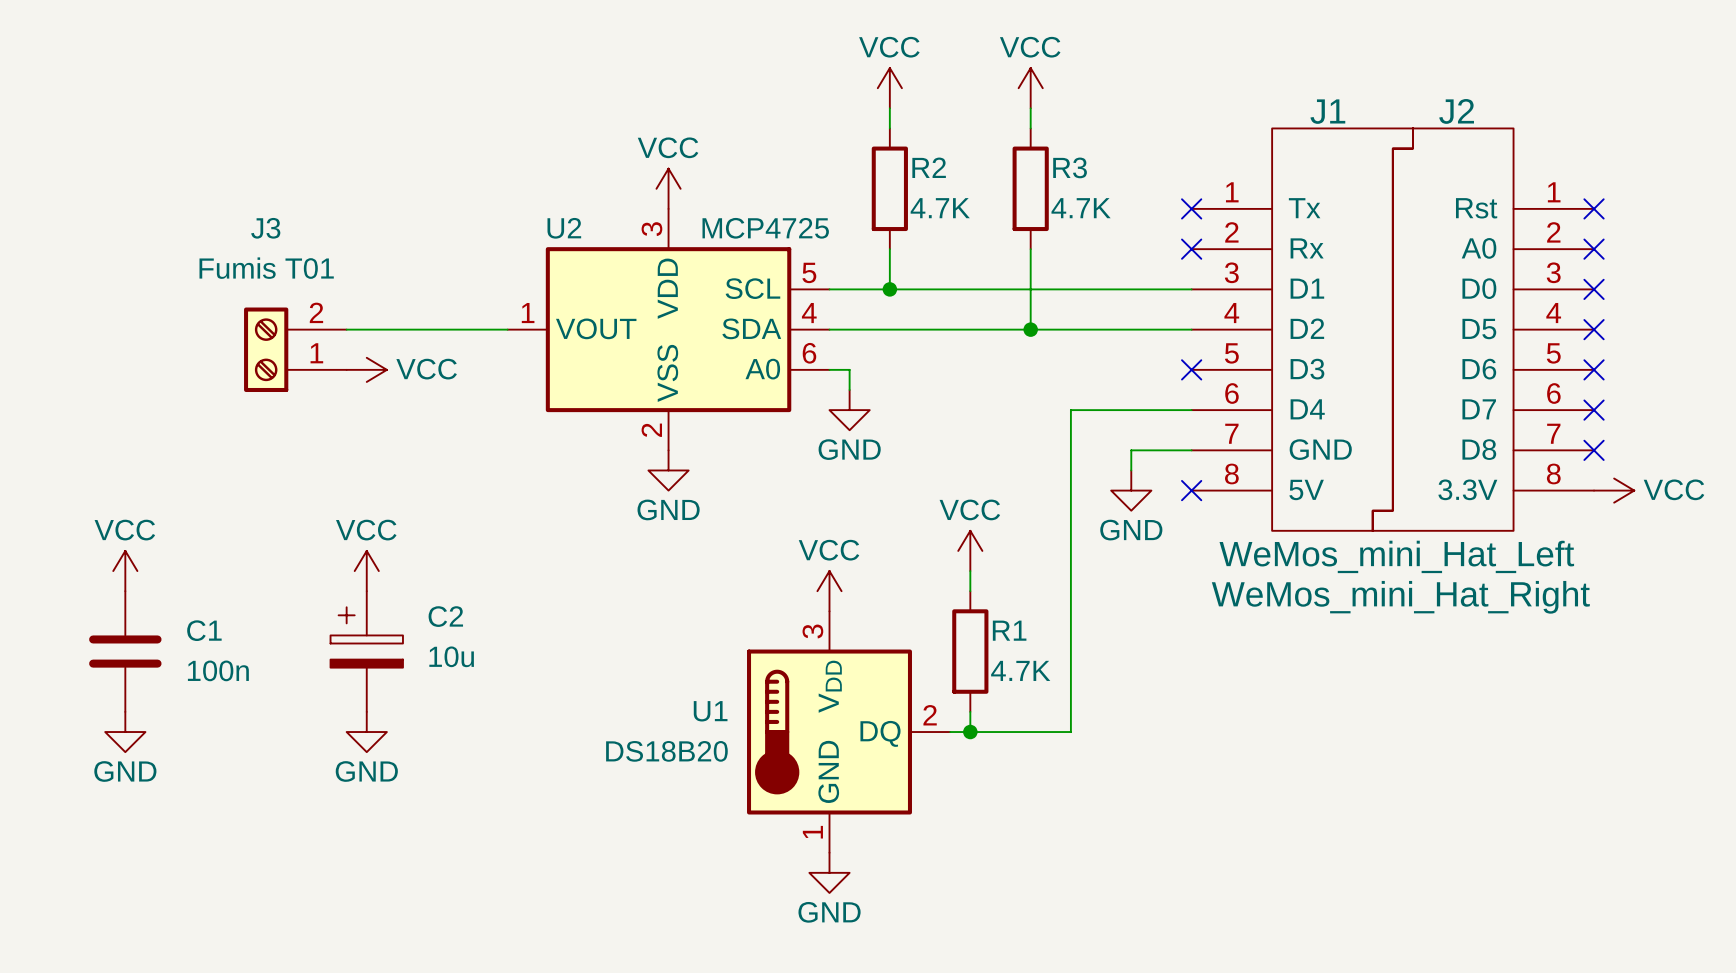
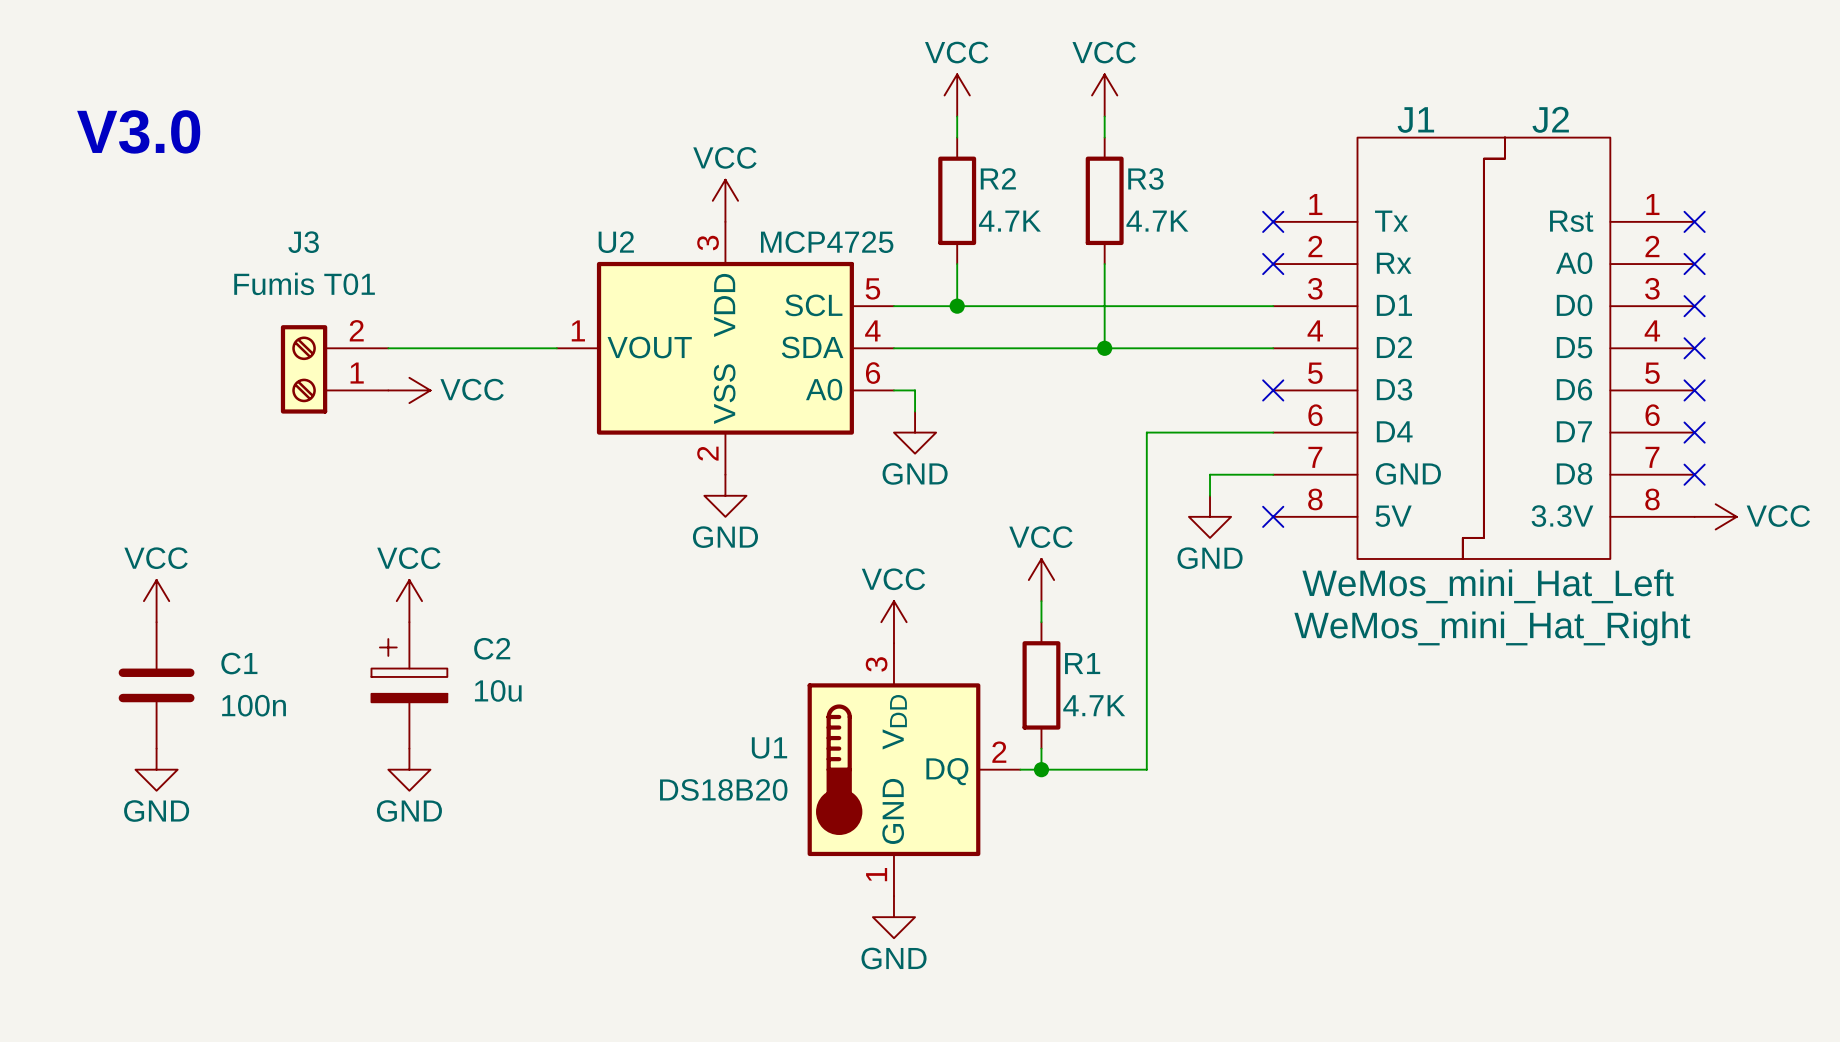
text: none -> V3.0 (138, 131)

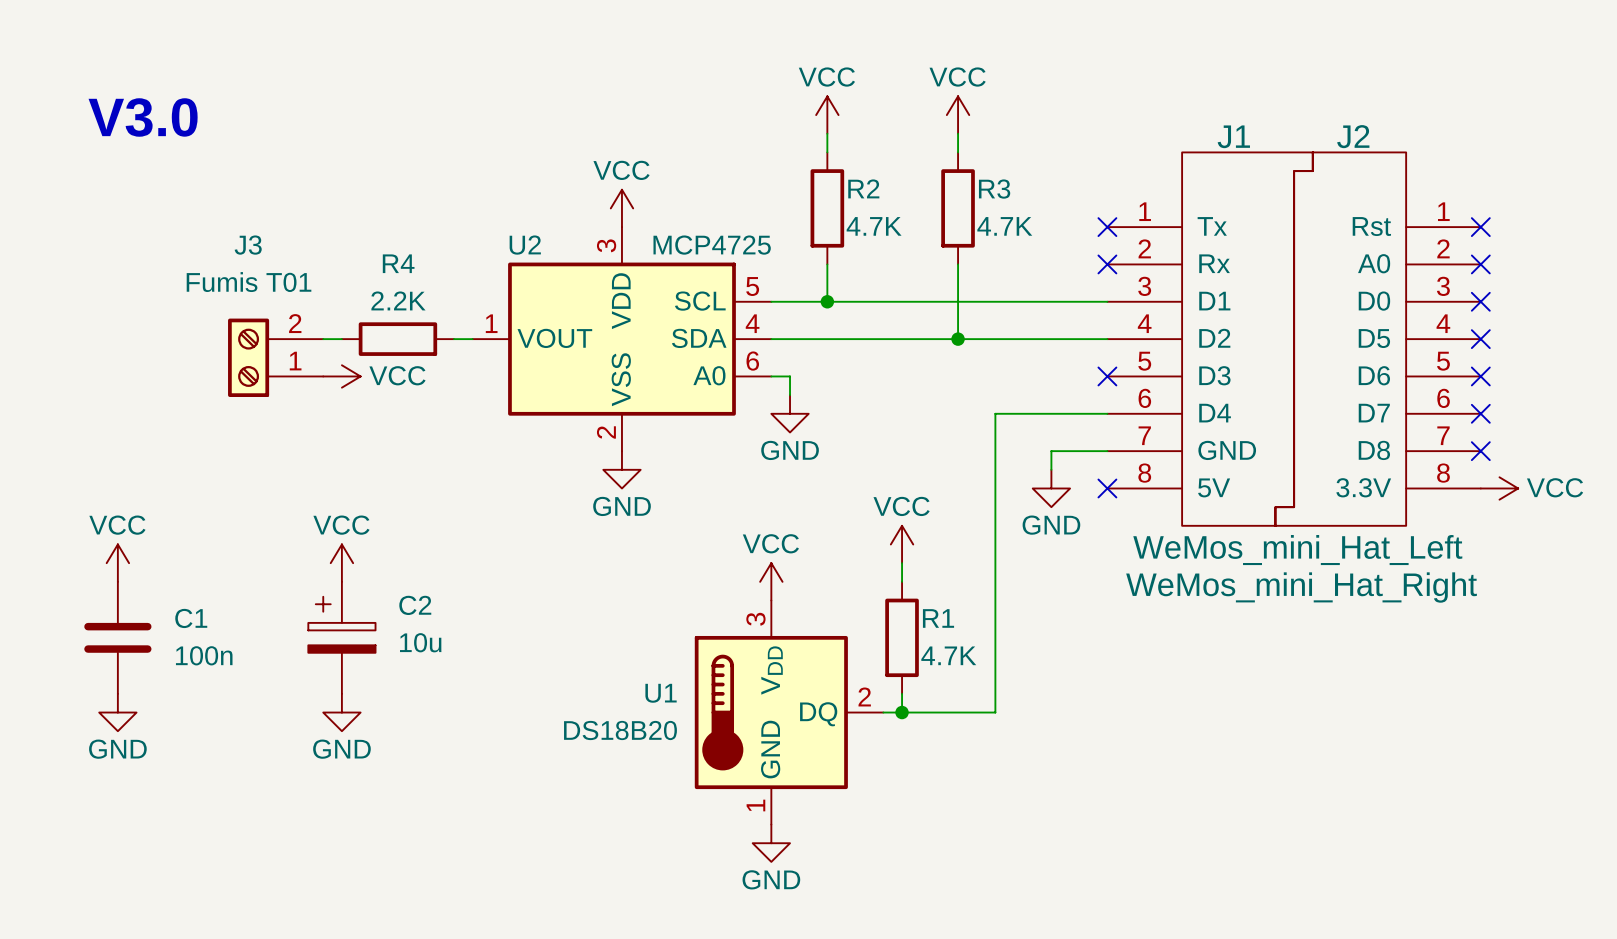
text position: V3.0 (138, 131) -> V3.0 (143, 117)
wire: (409, 348) (535, 348) -> none
R4: none -> 2.2K (397, 339)

